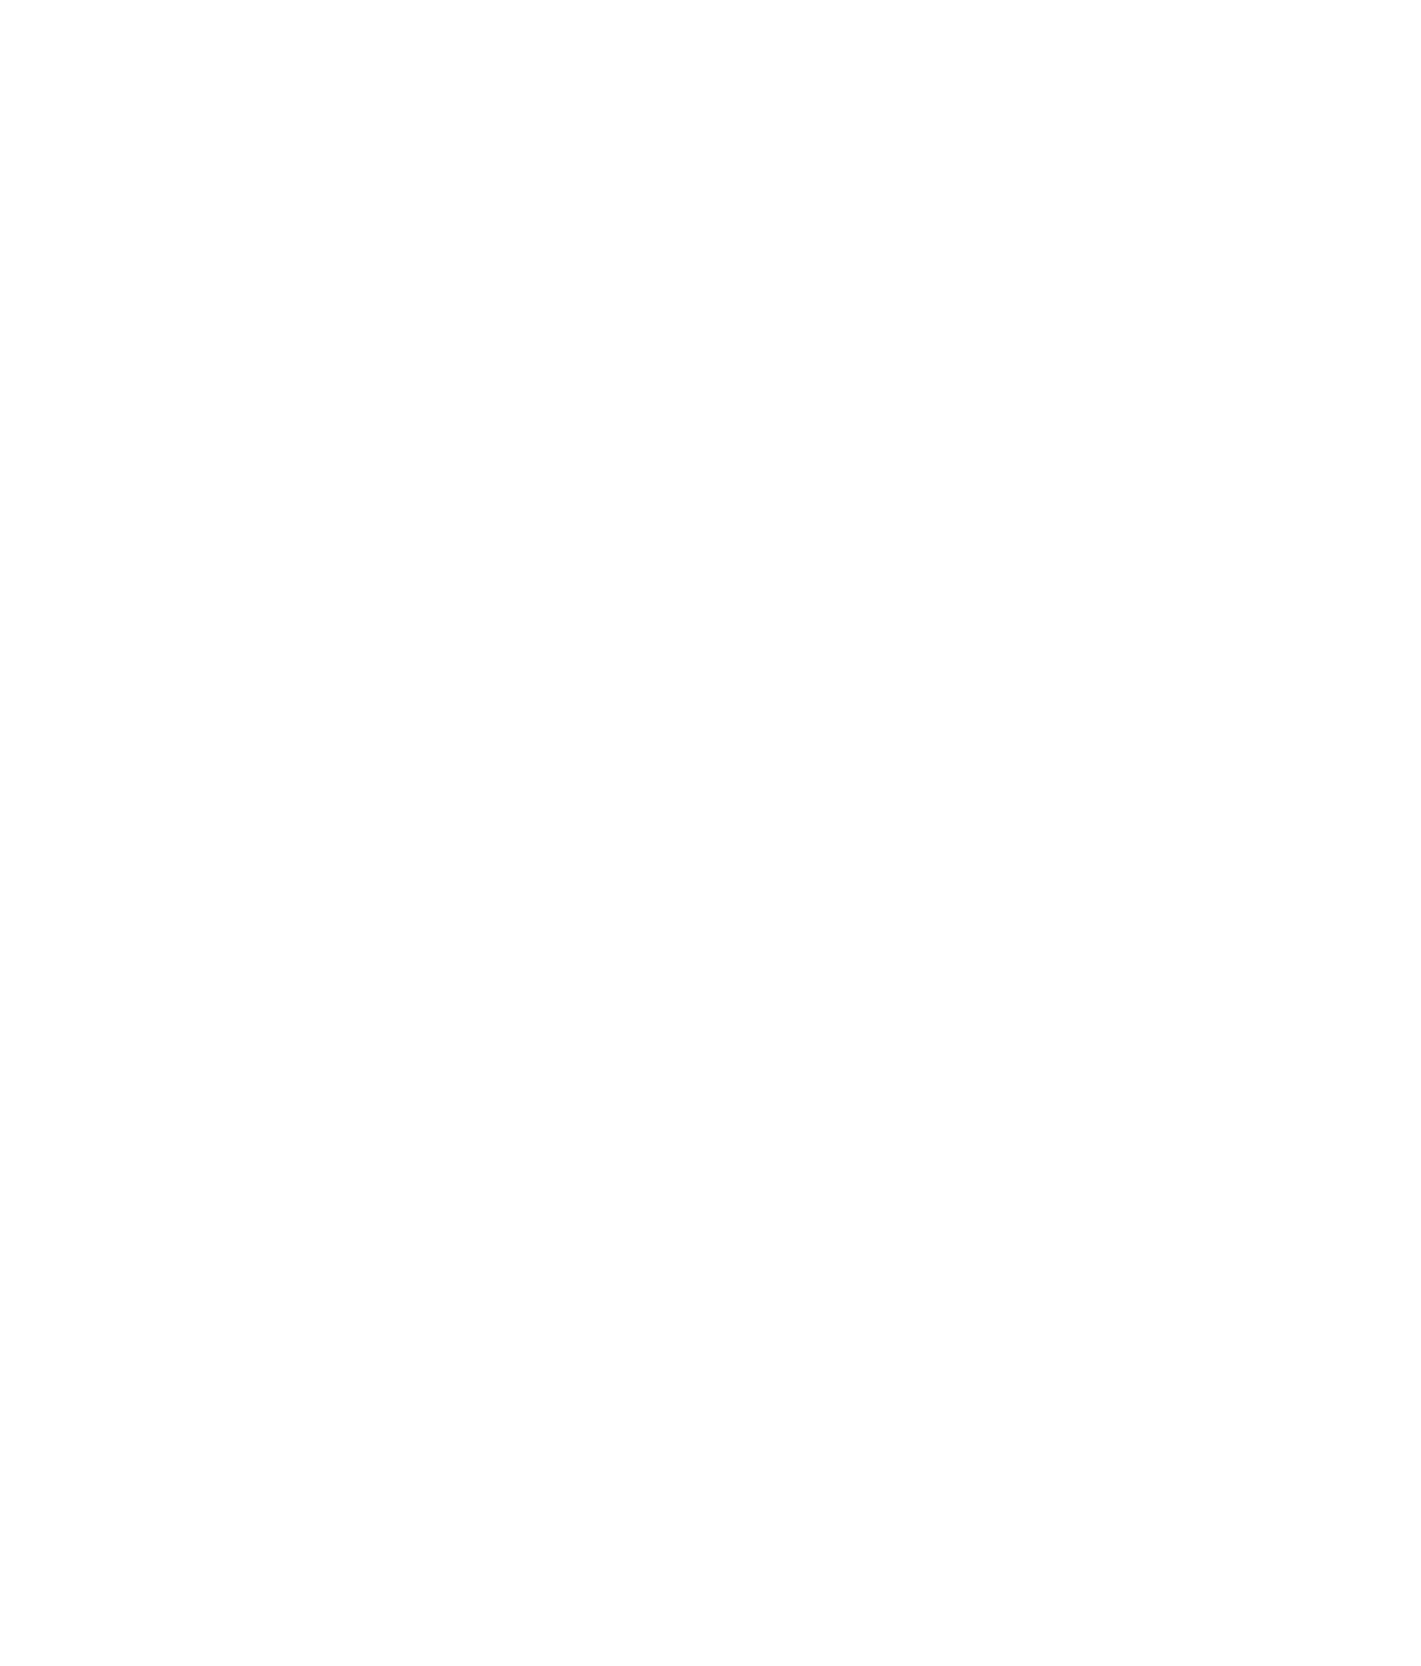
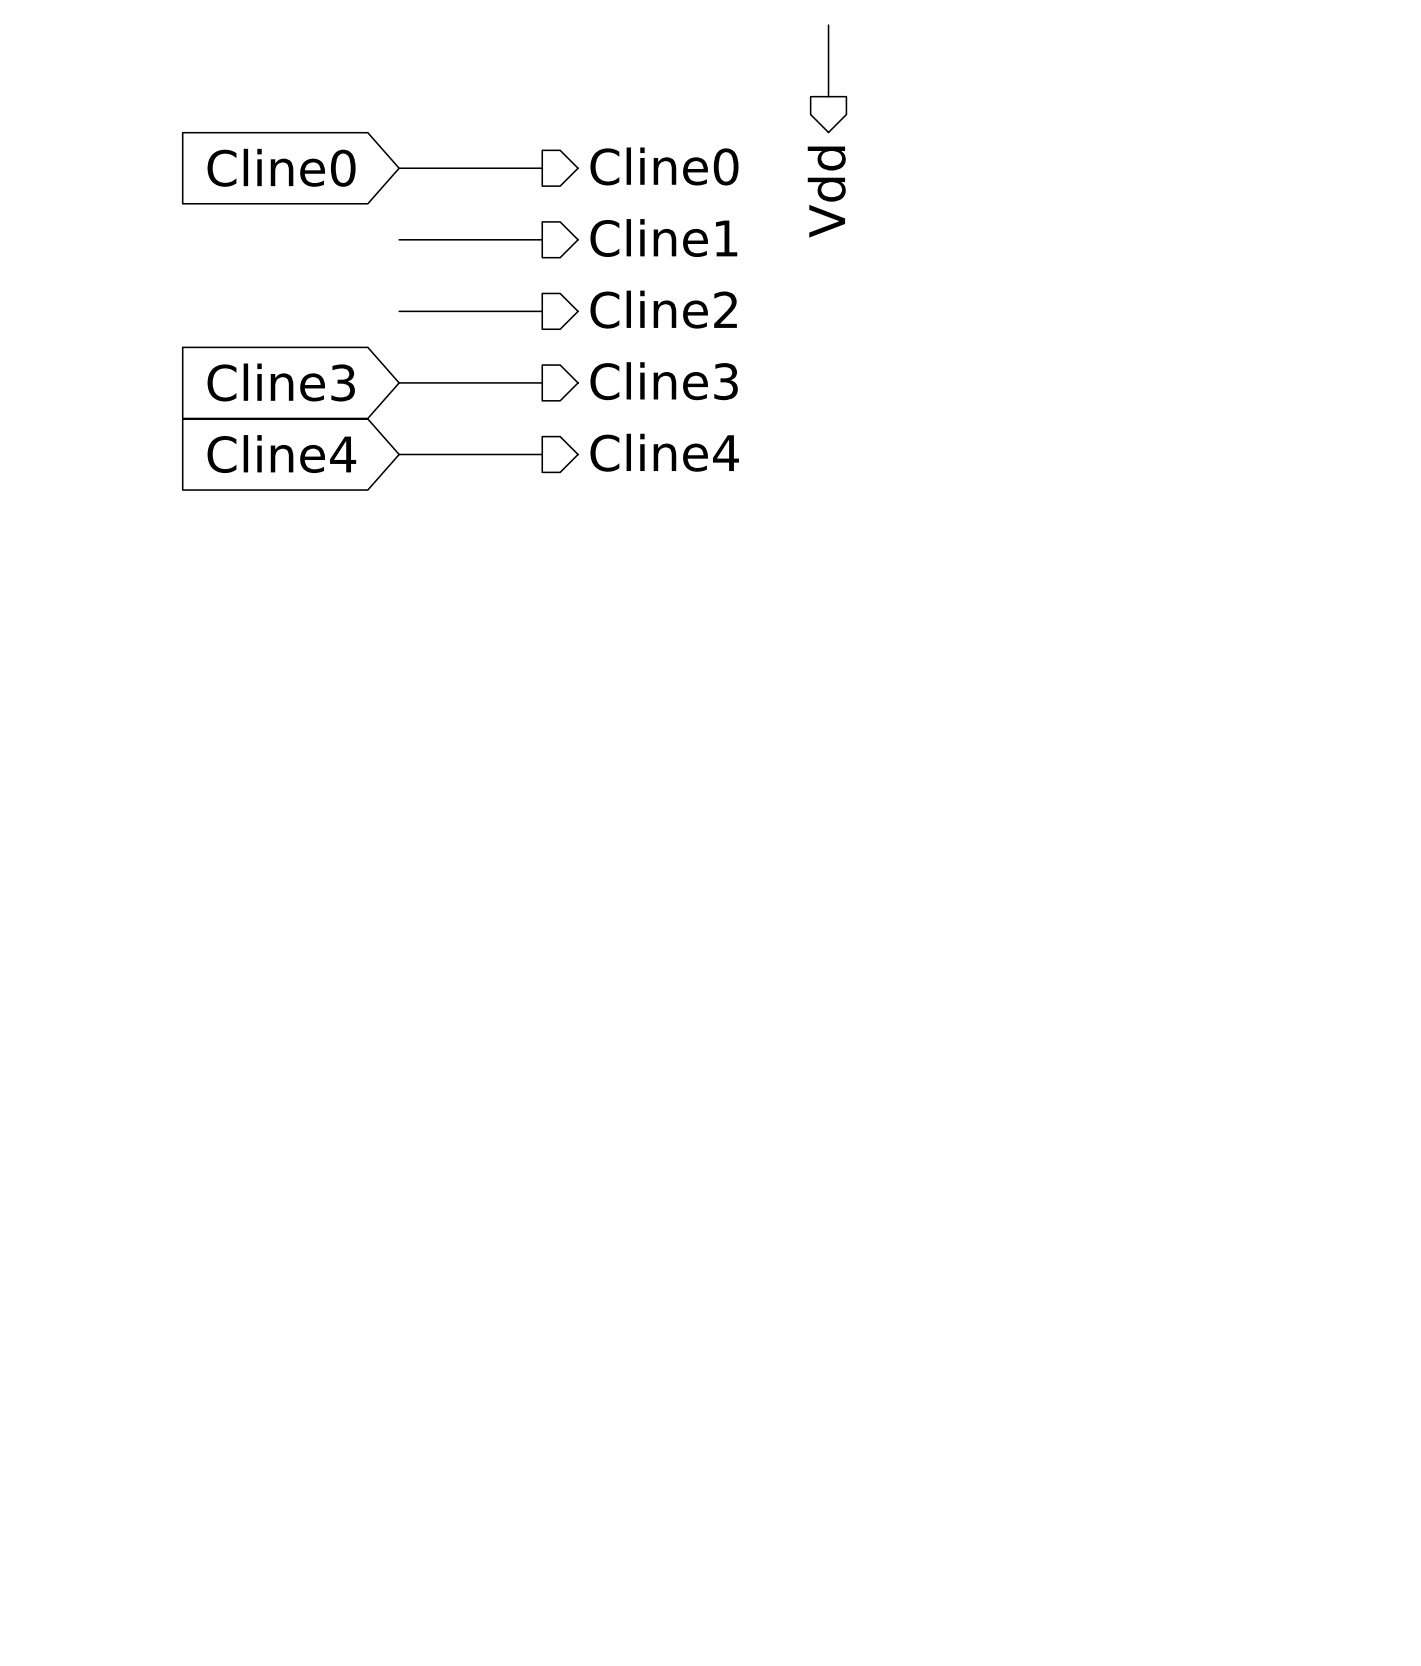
wire: none -> (828, 25) (828, 96)
sheet pin: none -> Cline0 (664, 166)
global label: none -> Cline0 (281, 167)
wire: none -> (399, 168) (542, 168)
sheet pin: none -> Vdd (826, 192)
sheet pin: none -> Cline1 (663, 238)
wire: none -> (399, 239) (542, 239)
sheet pin: none -> Cline2 (663, 309)
wire: none -> (399, 311) (542, 311)
sheet pin: none -> Cline3 (664, 381)
global label: none -> Cline3 (281, 382)
wire: none -> (399, 382) (542, 382)
sheet pin: none -> Cline4 (664, 452)
global label: none -> Cline4 (281, 454)
wire: none -> (399, 454) (542, 454)

